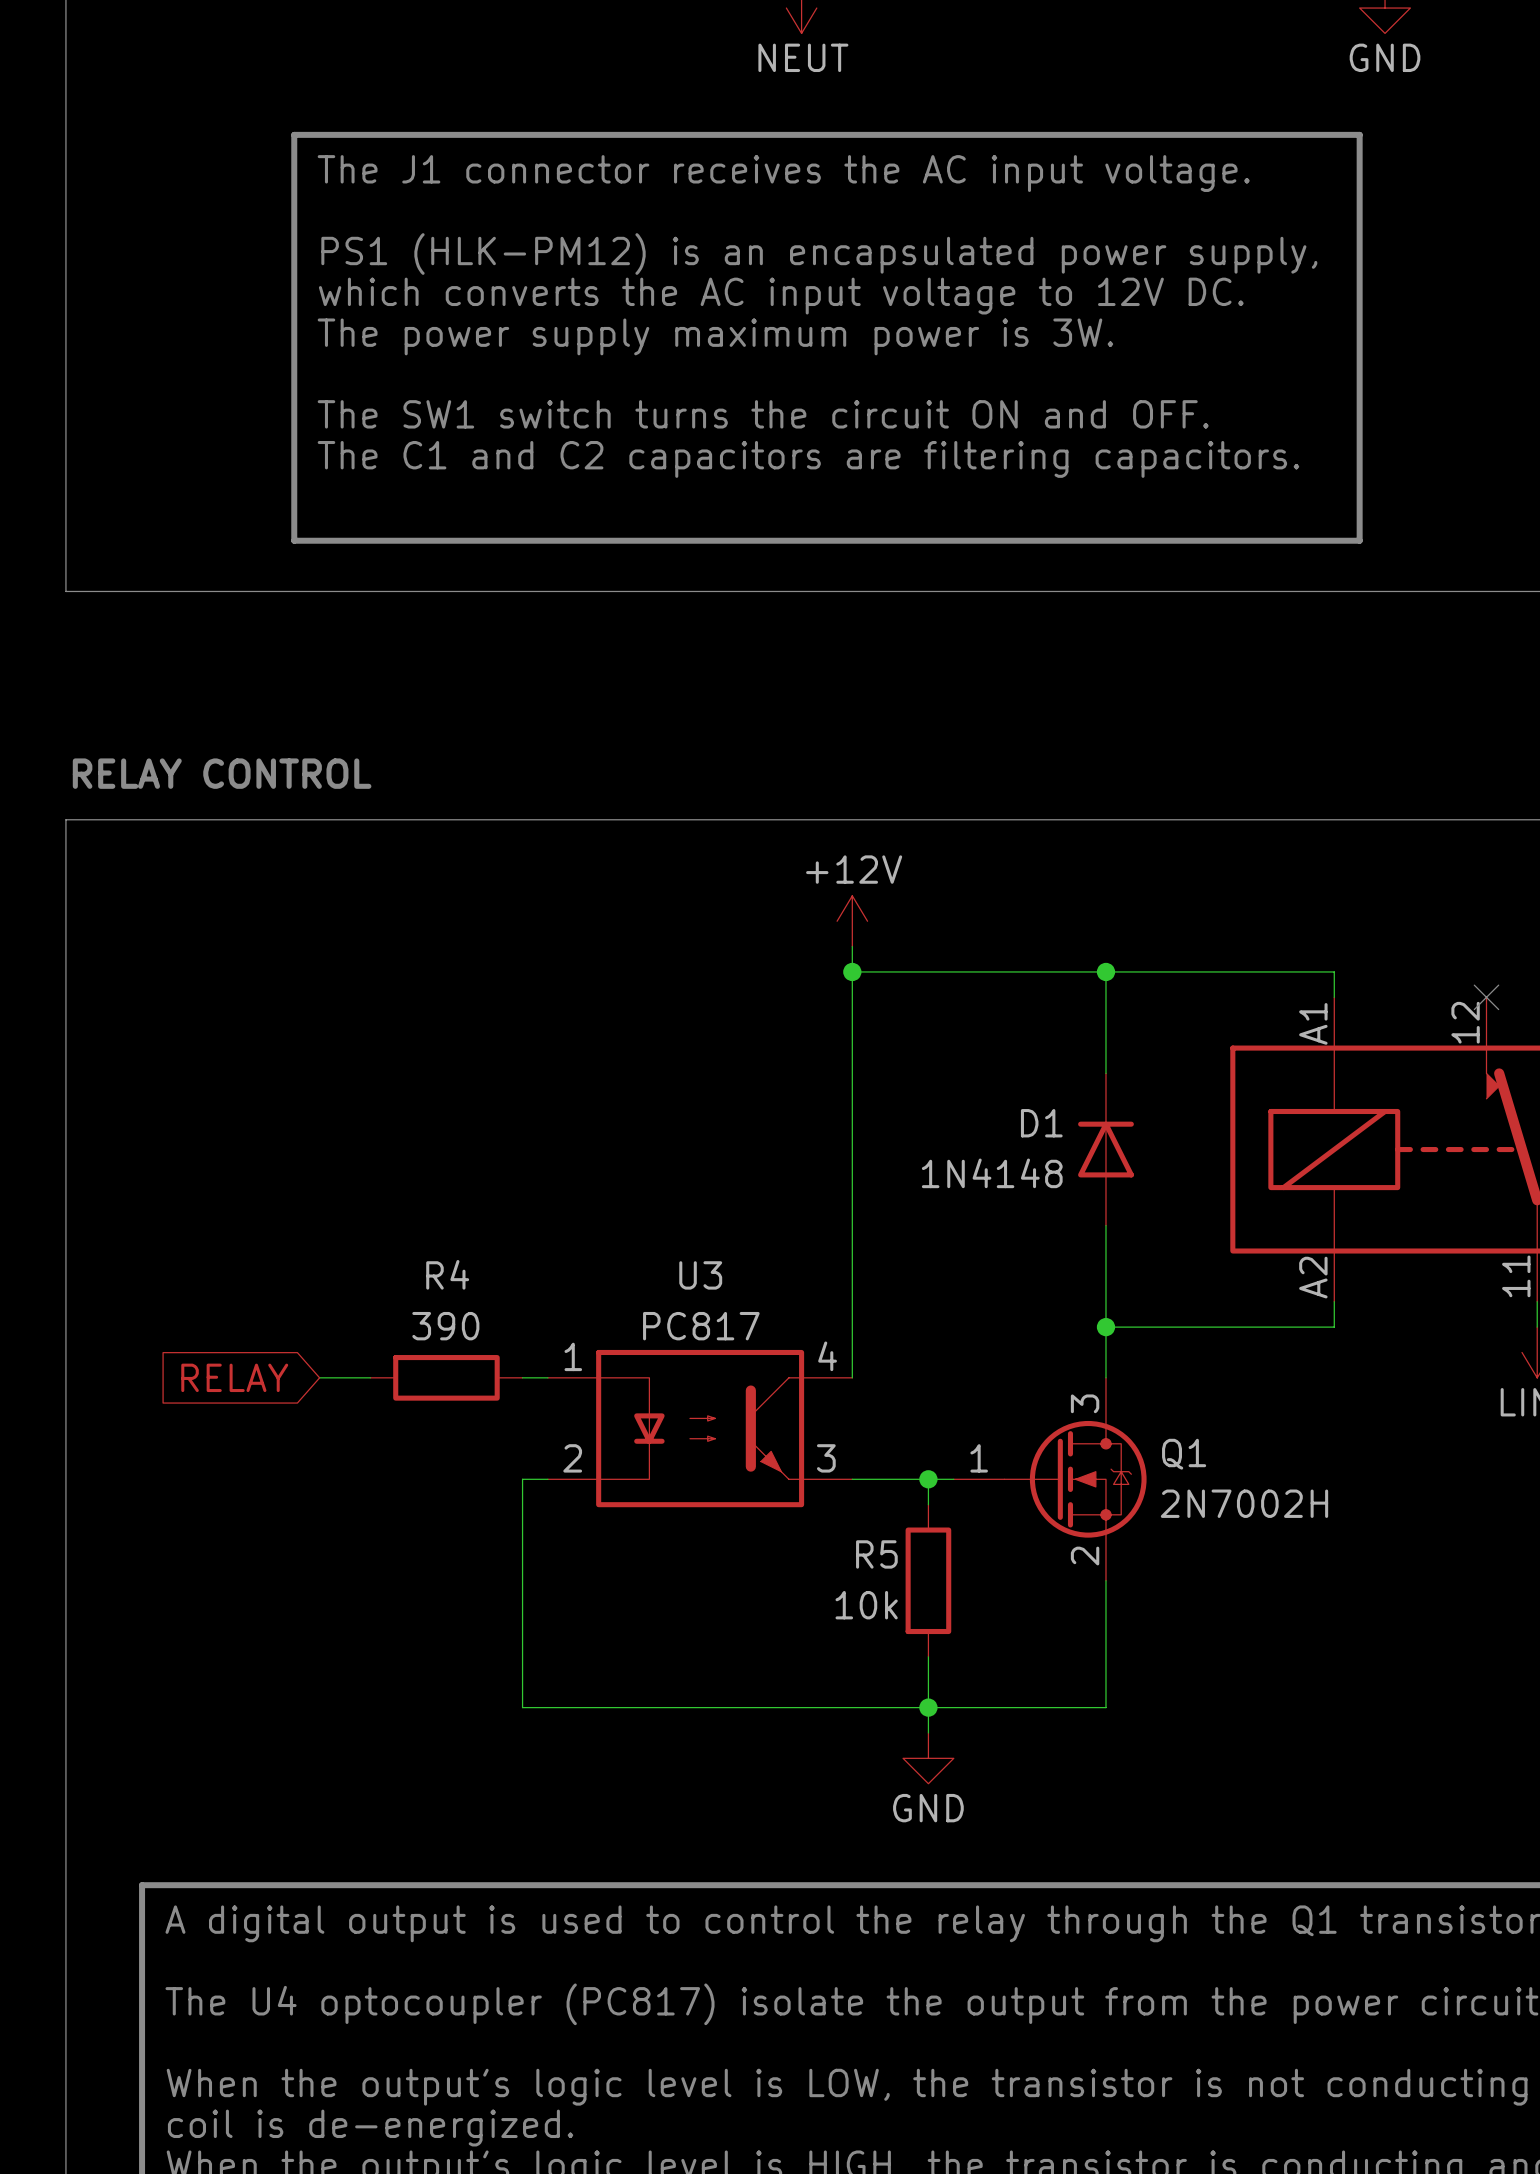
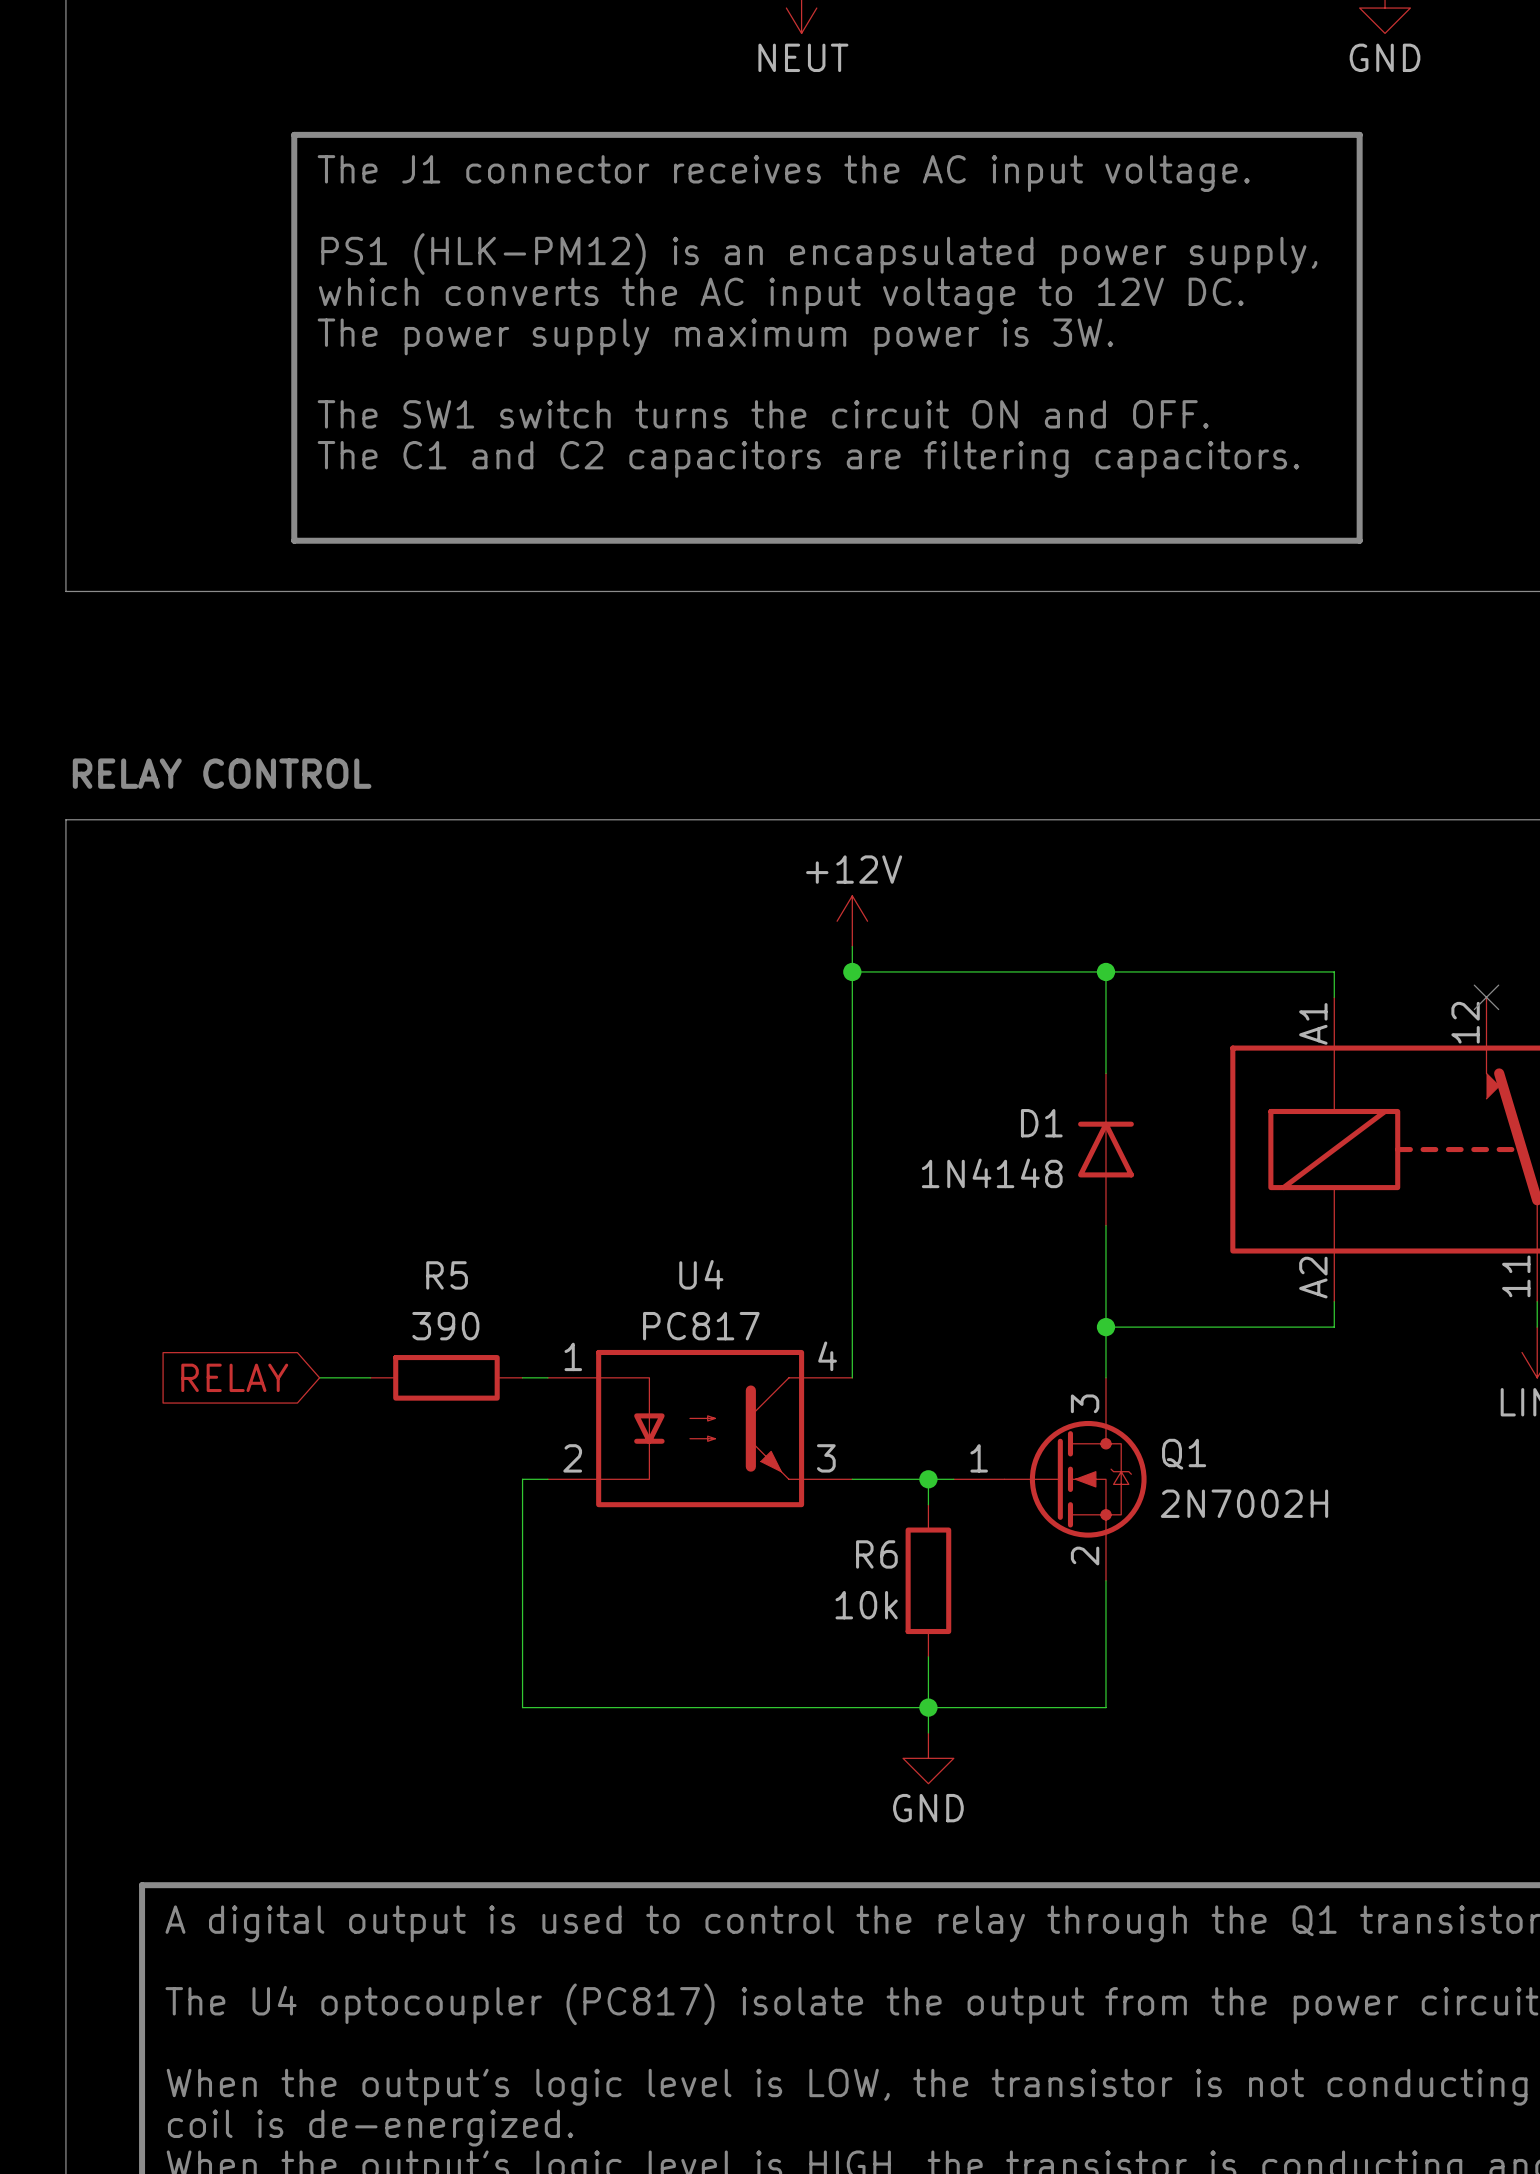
R4 name: R4 (447, 1274) -> R5 (447, 1275)
U3 name: U3 (700, 1275) -> U4 (701, 1274)
R5 name: R5 (876, 1554) -> R6 (876, 1554)

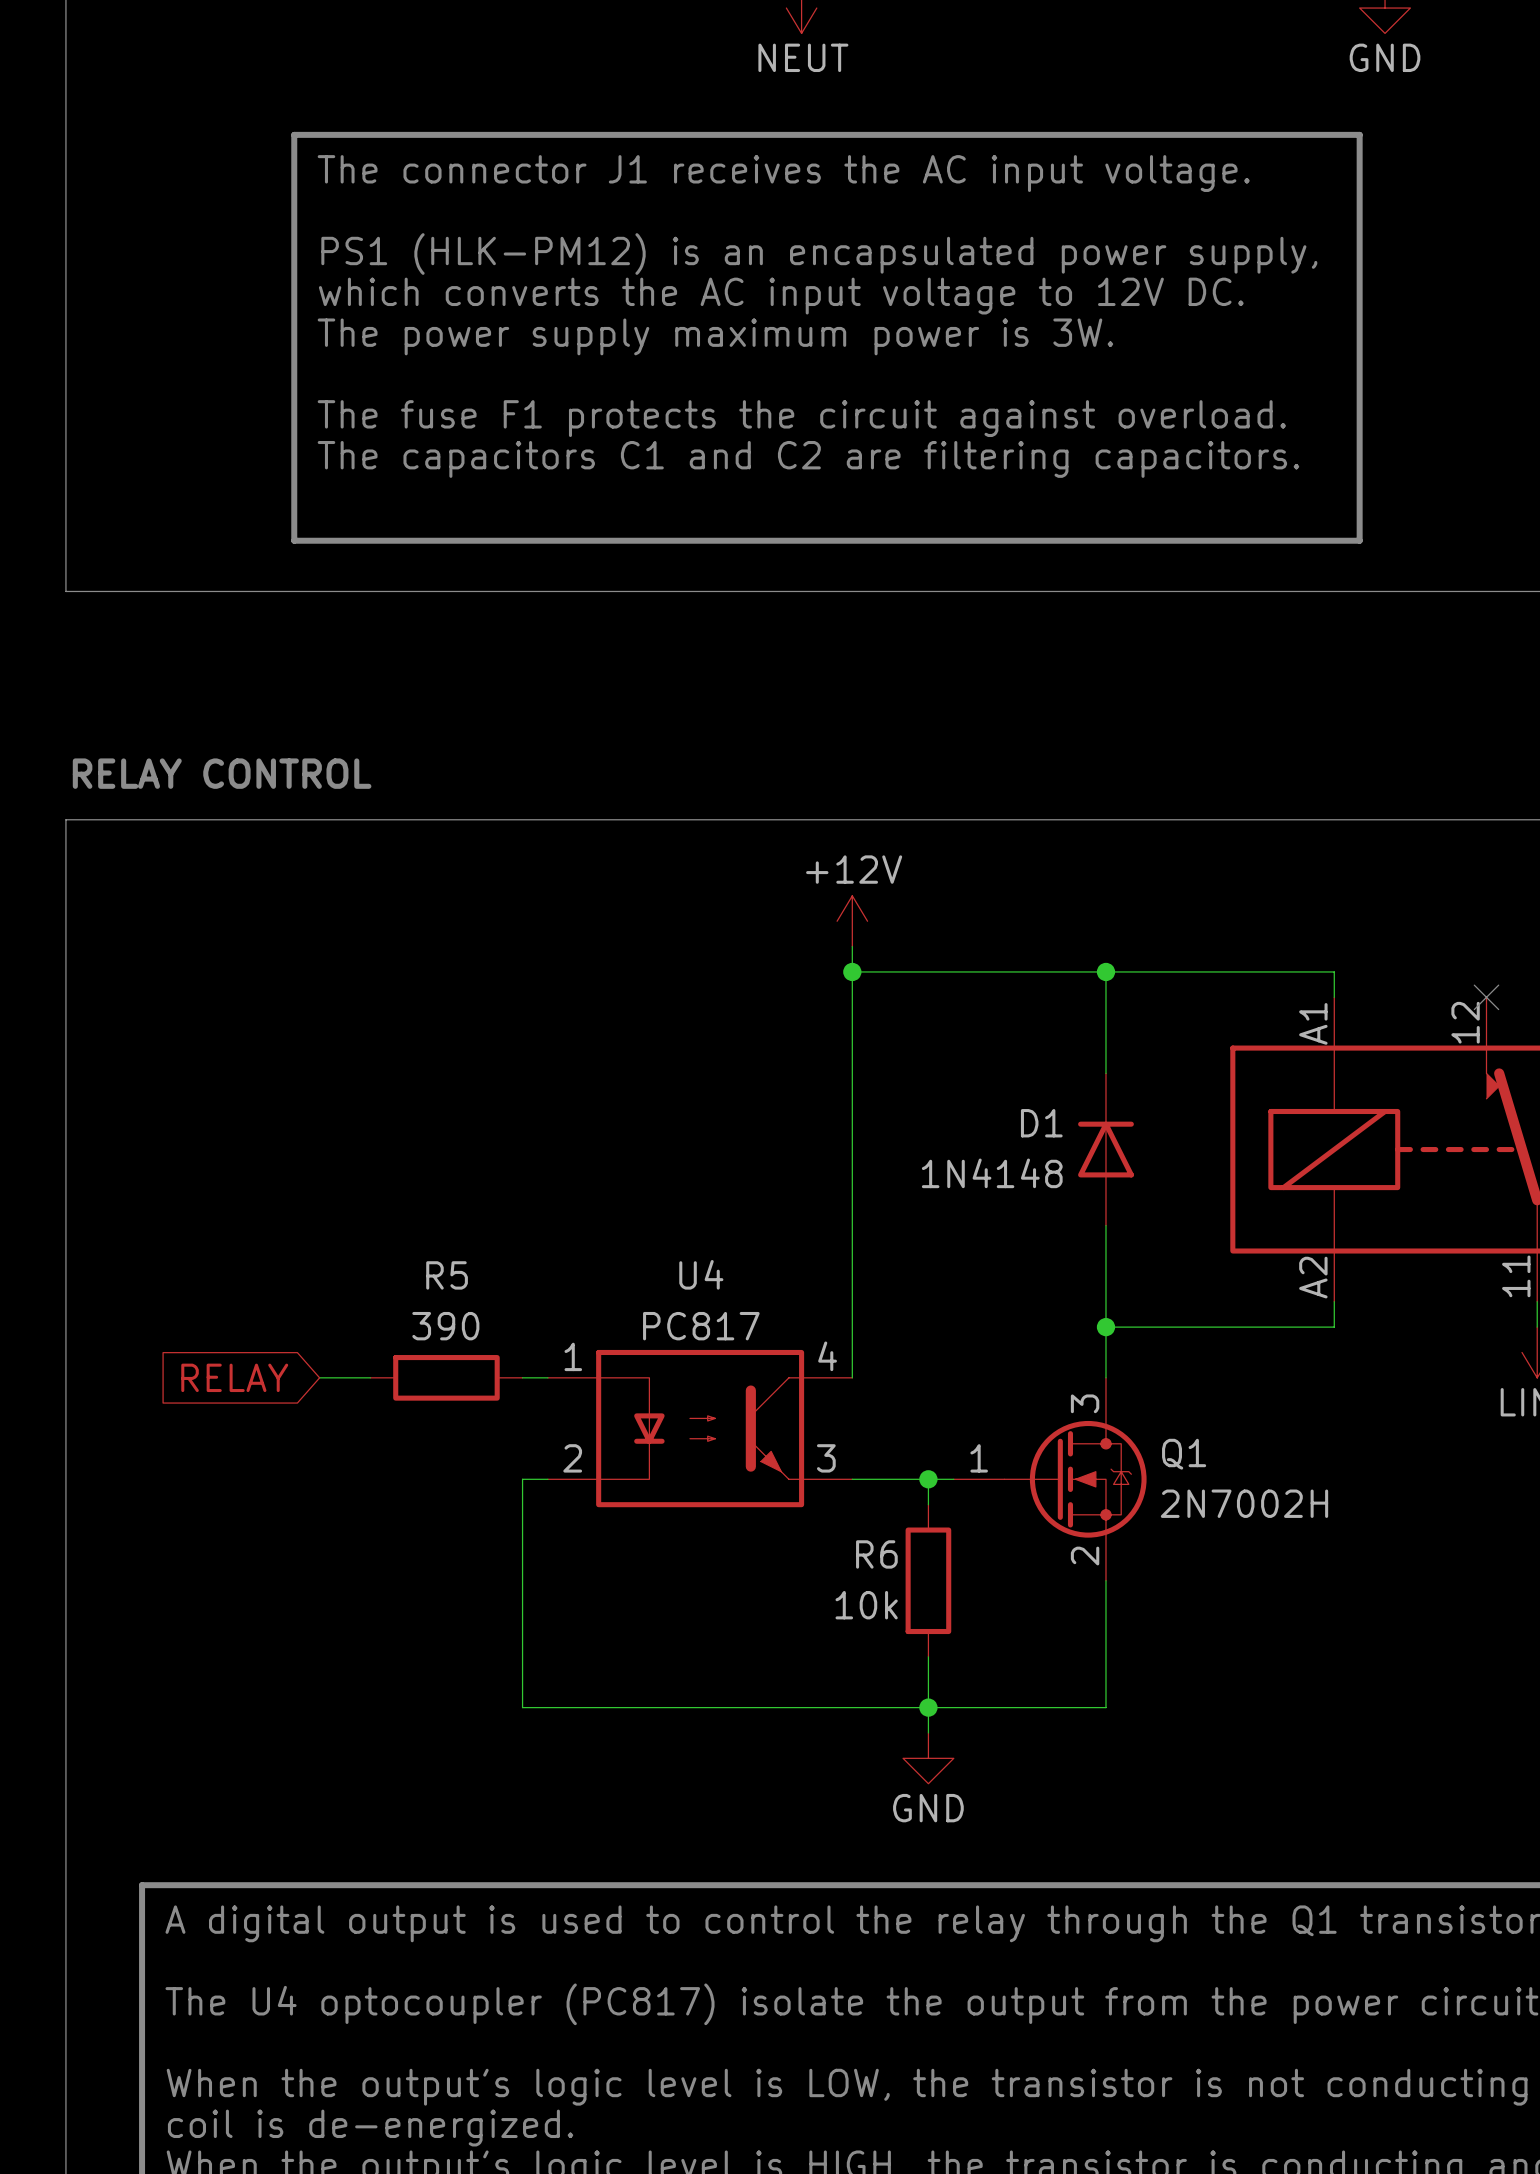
text: The J1 connector receives the AC input voltage. (783, 173) -> The connector J1 receives the AC input voltage. (783, 173)
text: The SW1 switch turns the circuit ON and OFF. (763, 414) -> The fuse F1 protects the circuit against overload. (801, 418)
text: The C1 and C2 capacitors are filtering capacitors. (808, 459) -> The capacitors C1 and C2 are filtering capacitors. (808, 459)

